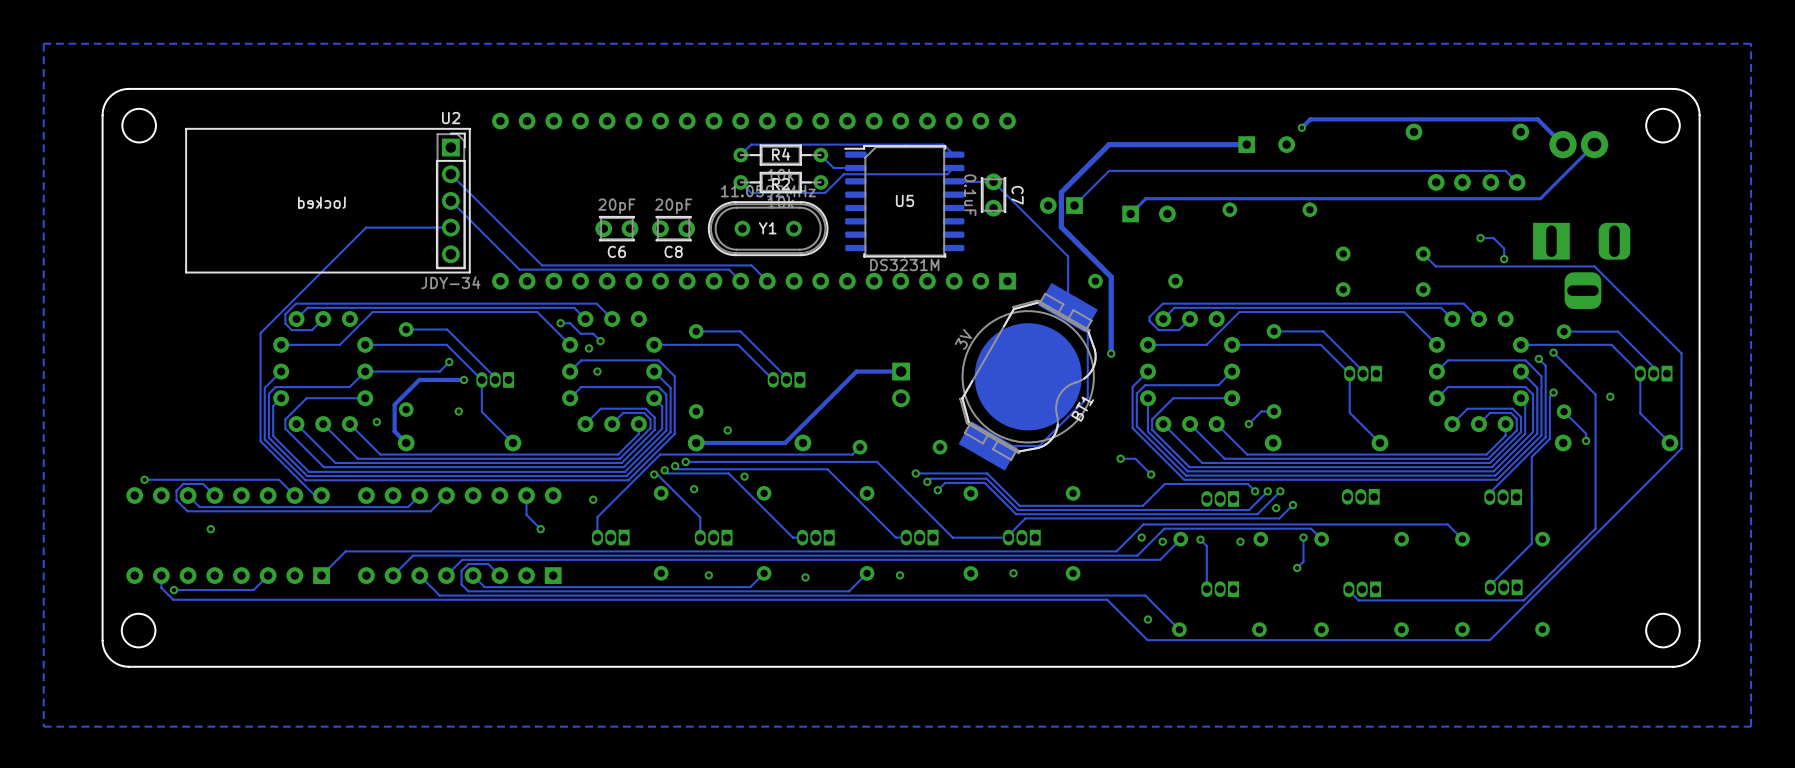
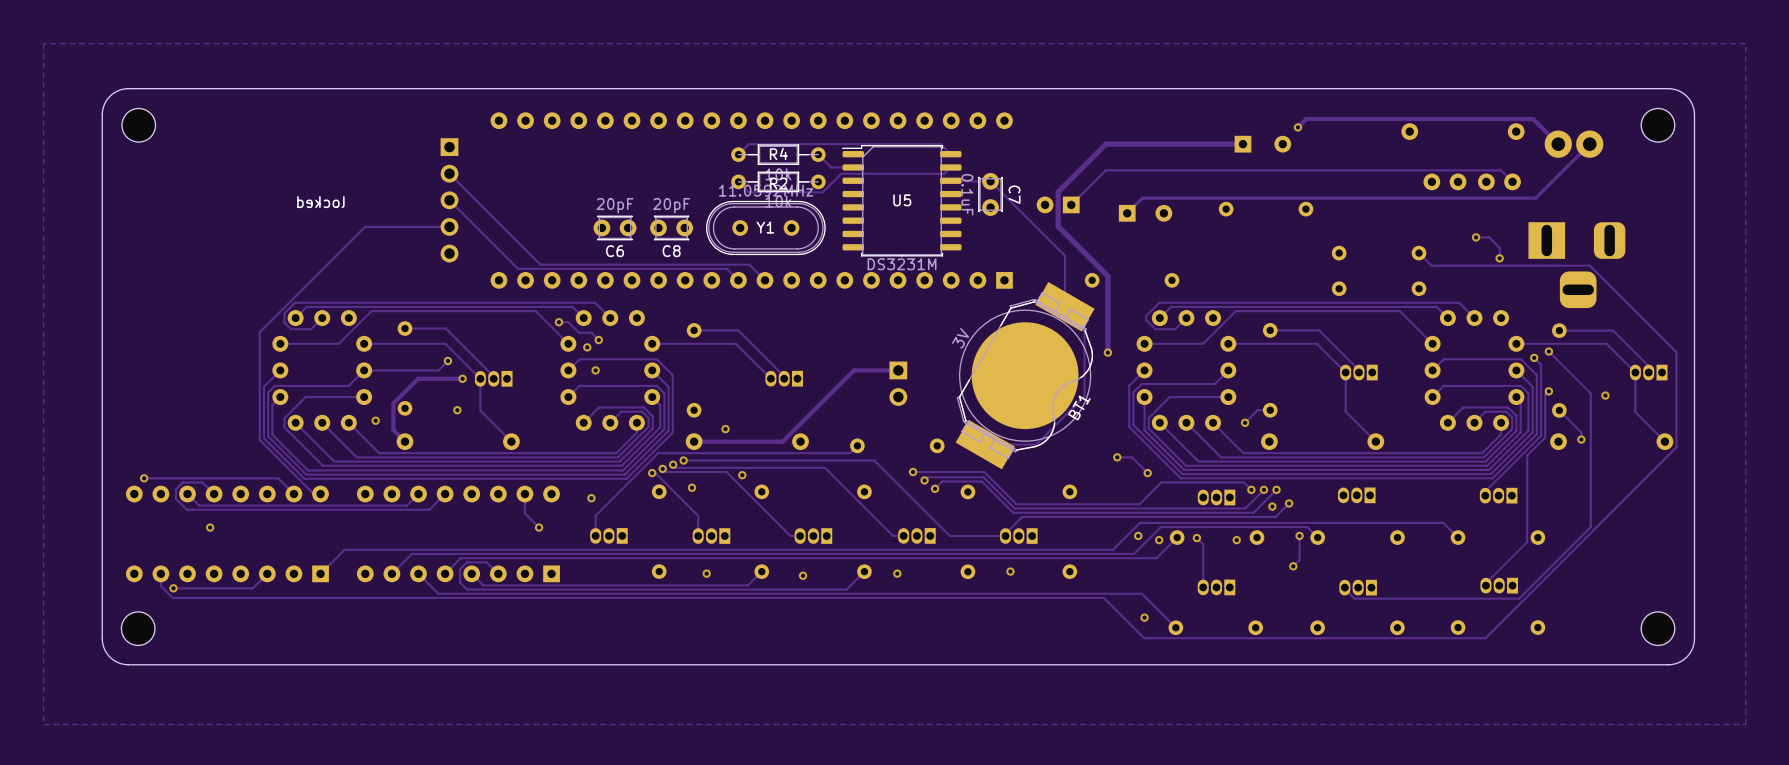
line: (469, 128) (186, 128) (186, 272) (469, 272) (469, 128) -> none
U2 side: bottom (450, 200) -> top (449, 200)

